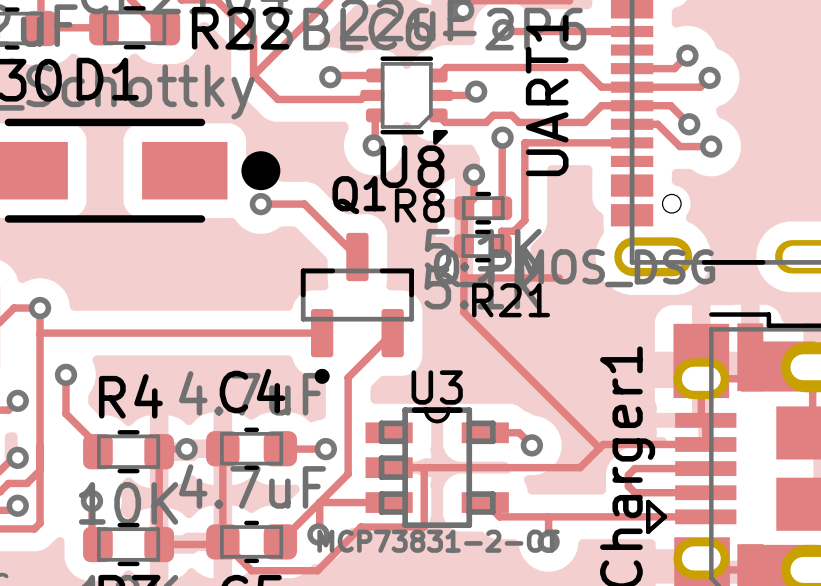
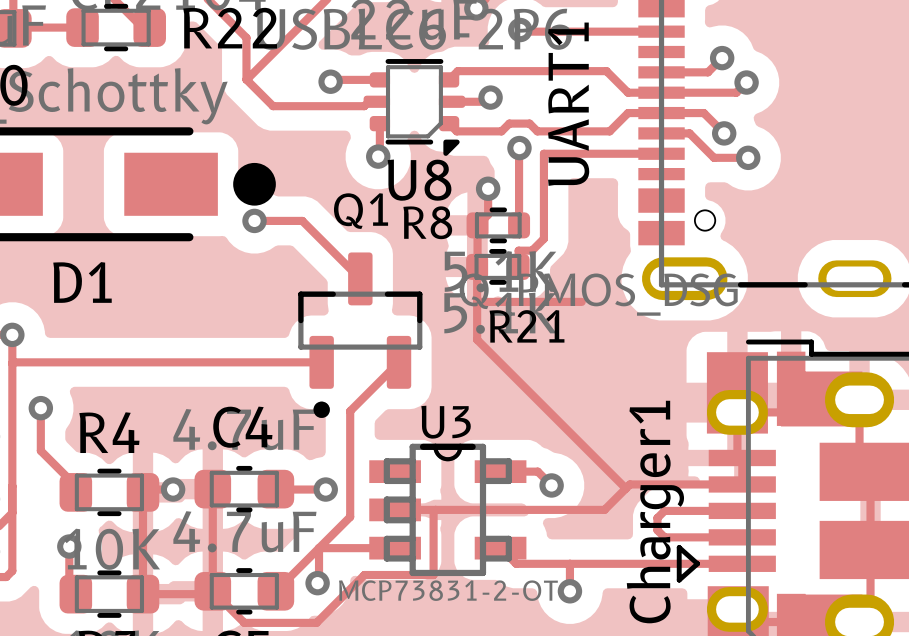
D1 name position: D1 (107, 79) -> D1 (82, 282)

